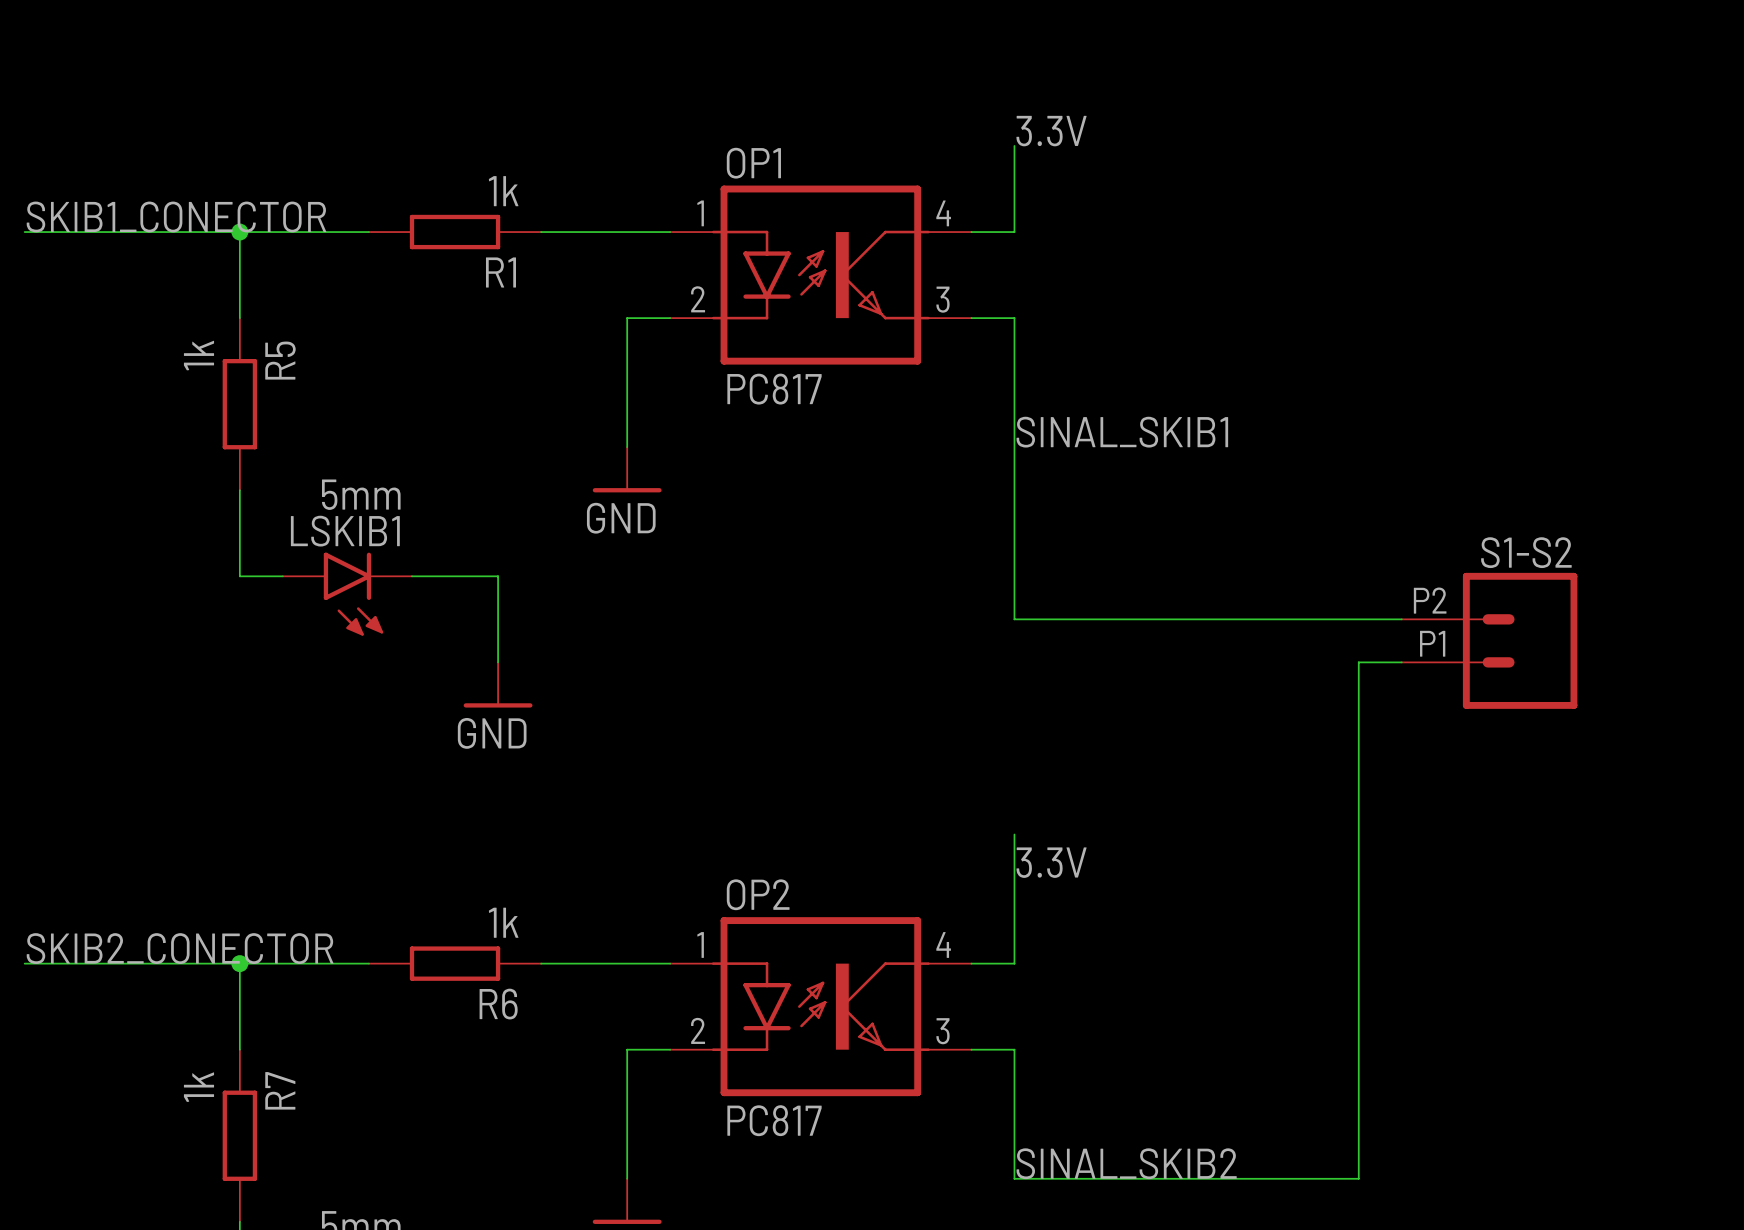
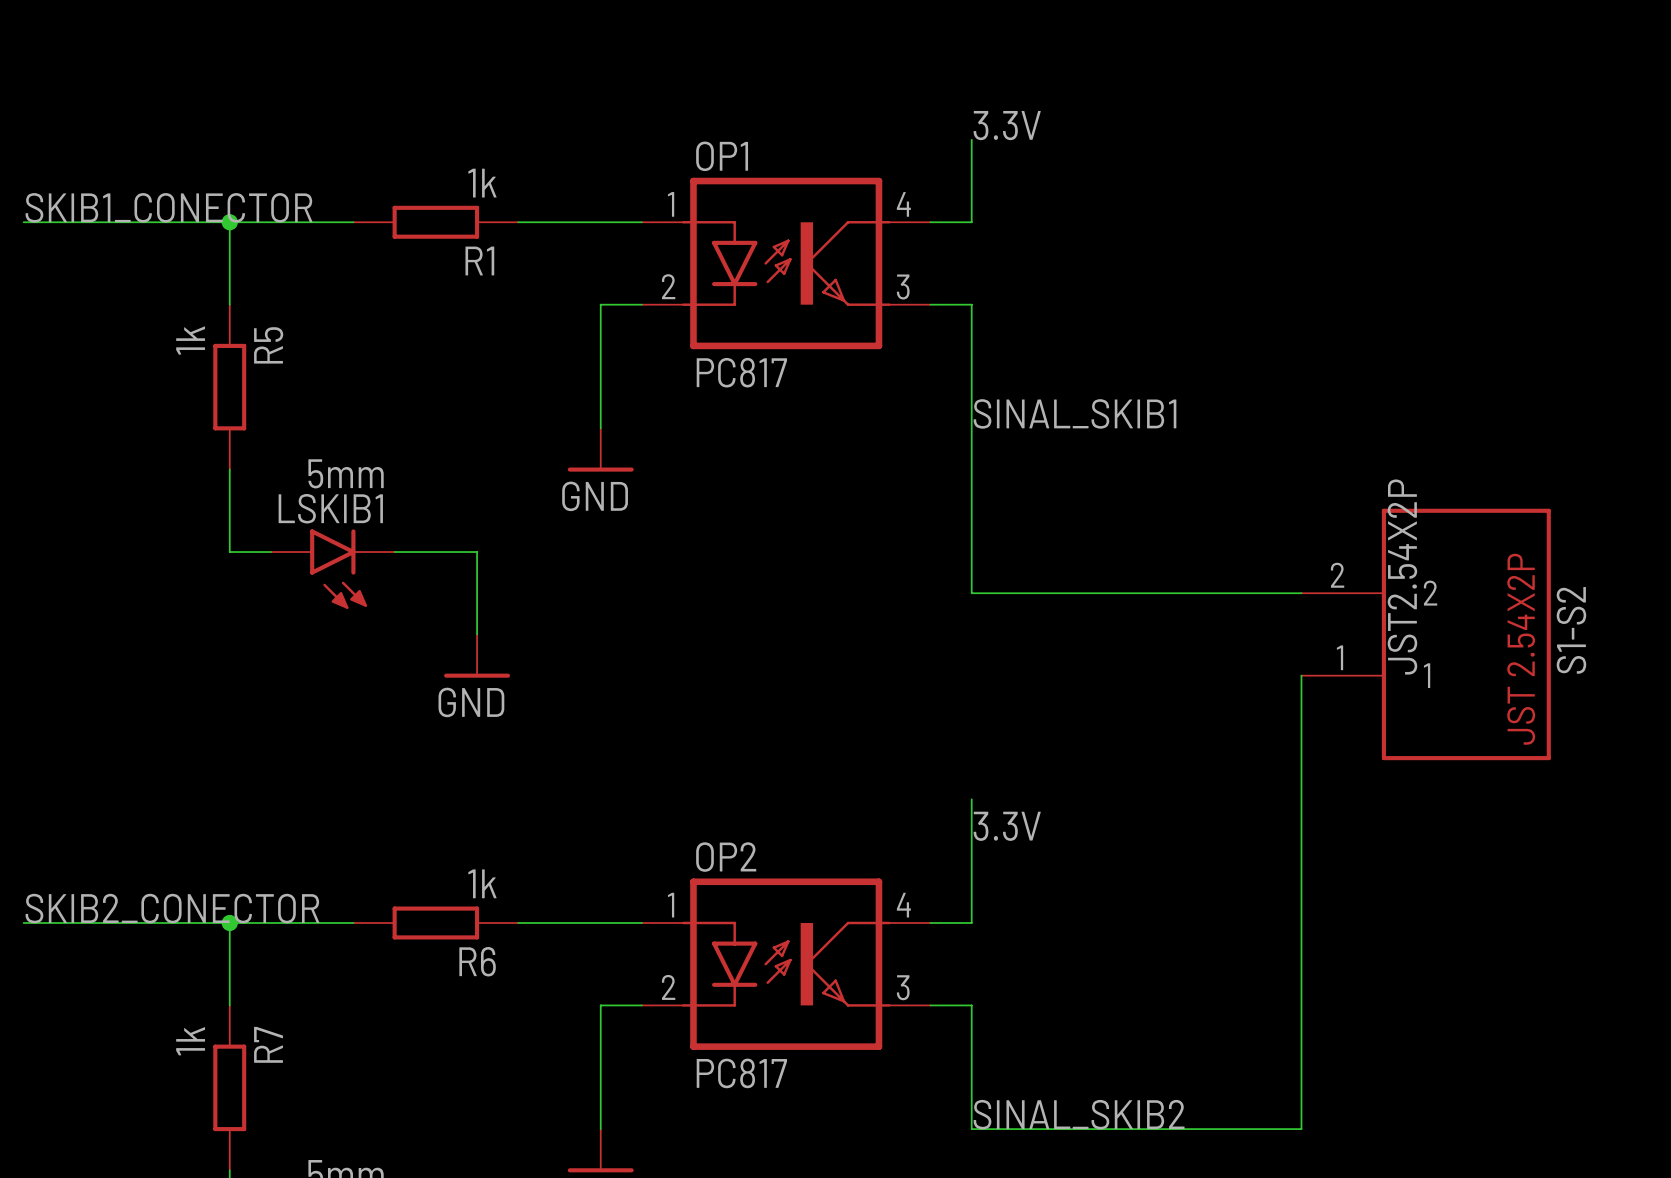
S1-S2 name position: S1-S2 (1526, 552) -> S1-S2 (1571, 630)
S1-S2 symbol: [1401, 572, 1578, 709] -> [1301, 508, 1551, 761]
S1-S2 value: none -> JST2.54X2P (1402, 577)
wire: (1401, 662) (1358, 662) (1358, 705) -> none

